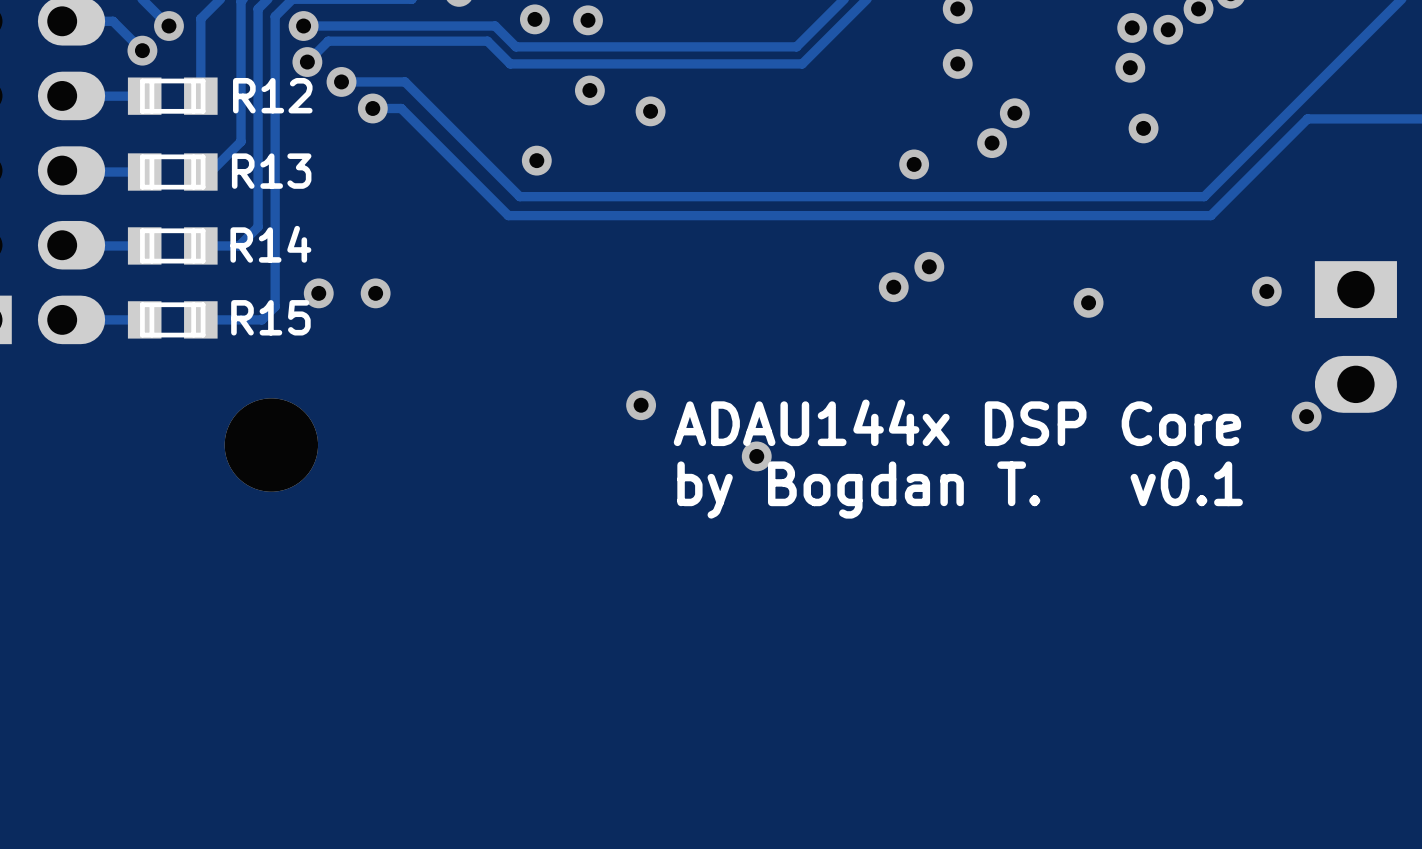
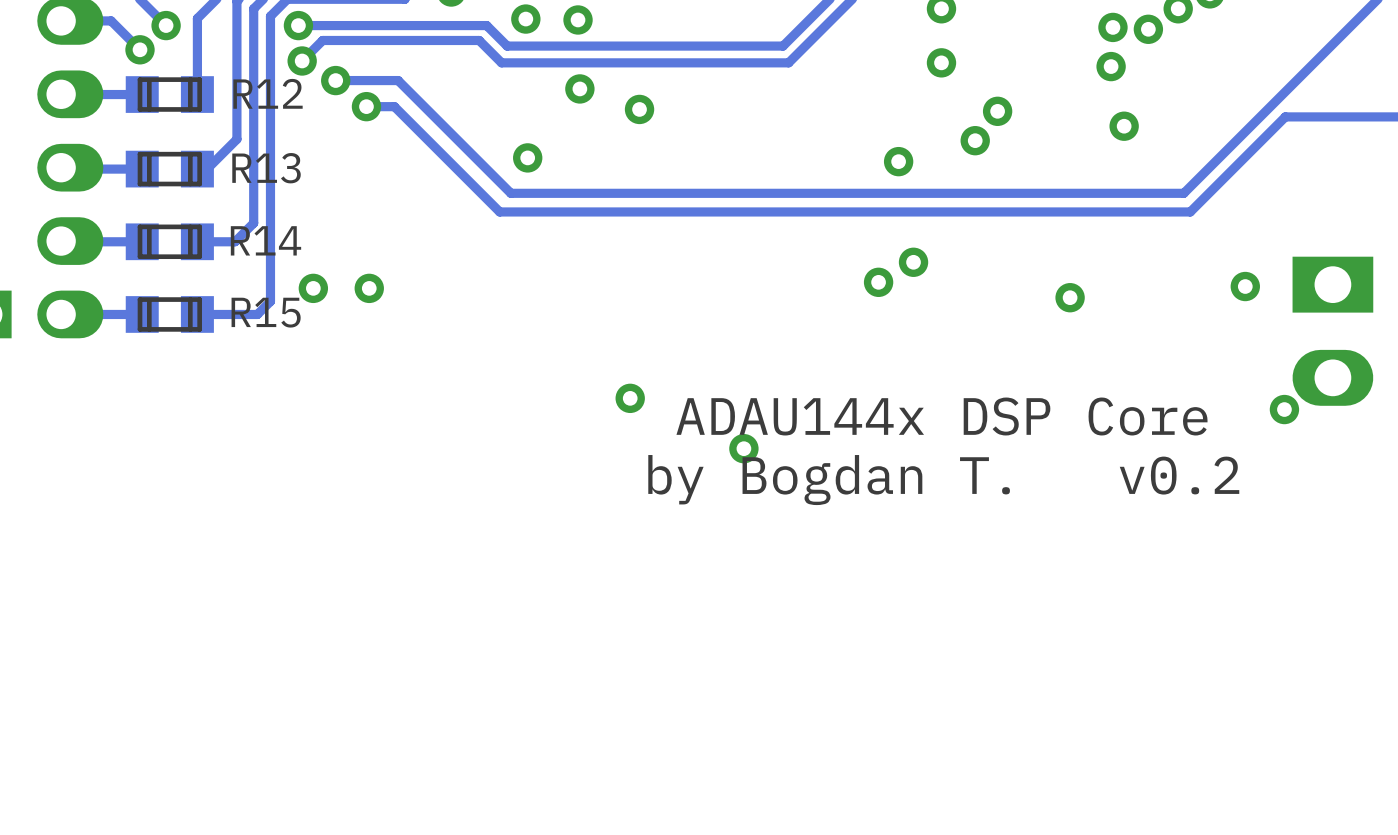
part: (271, 445) -> none
text: by Bogdan T. v0.1 (960, 490) -> by Bogdan T. v0.2 (943, 480)

